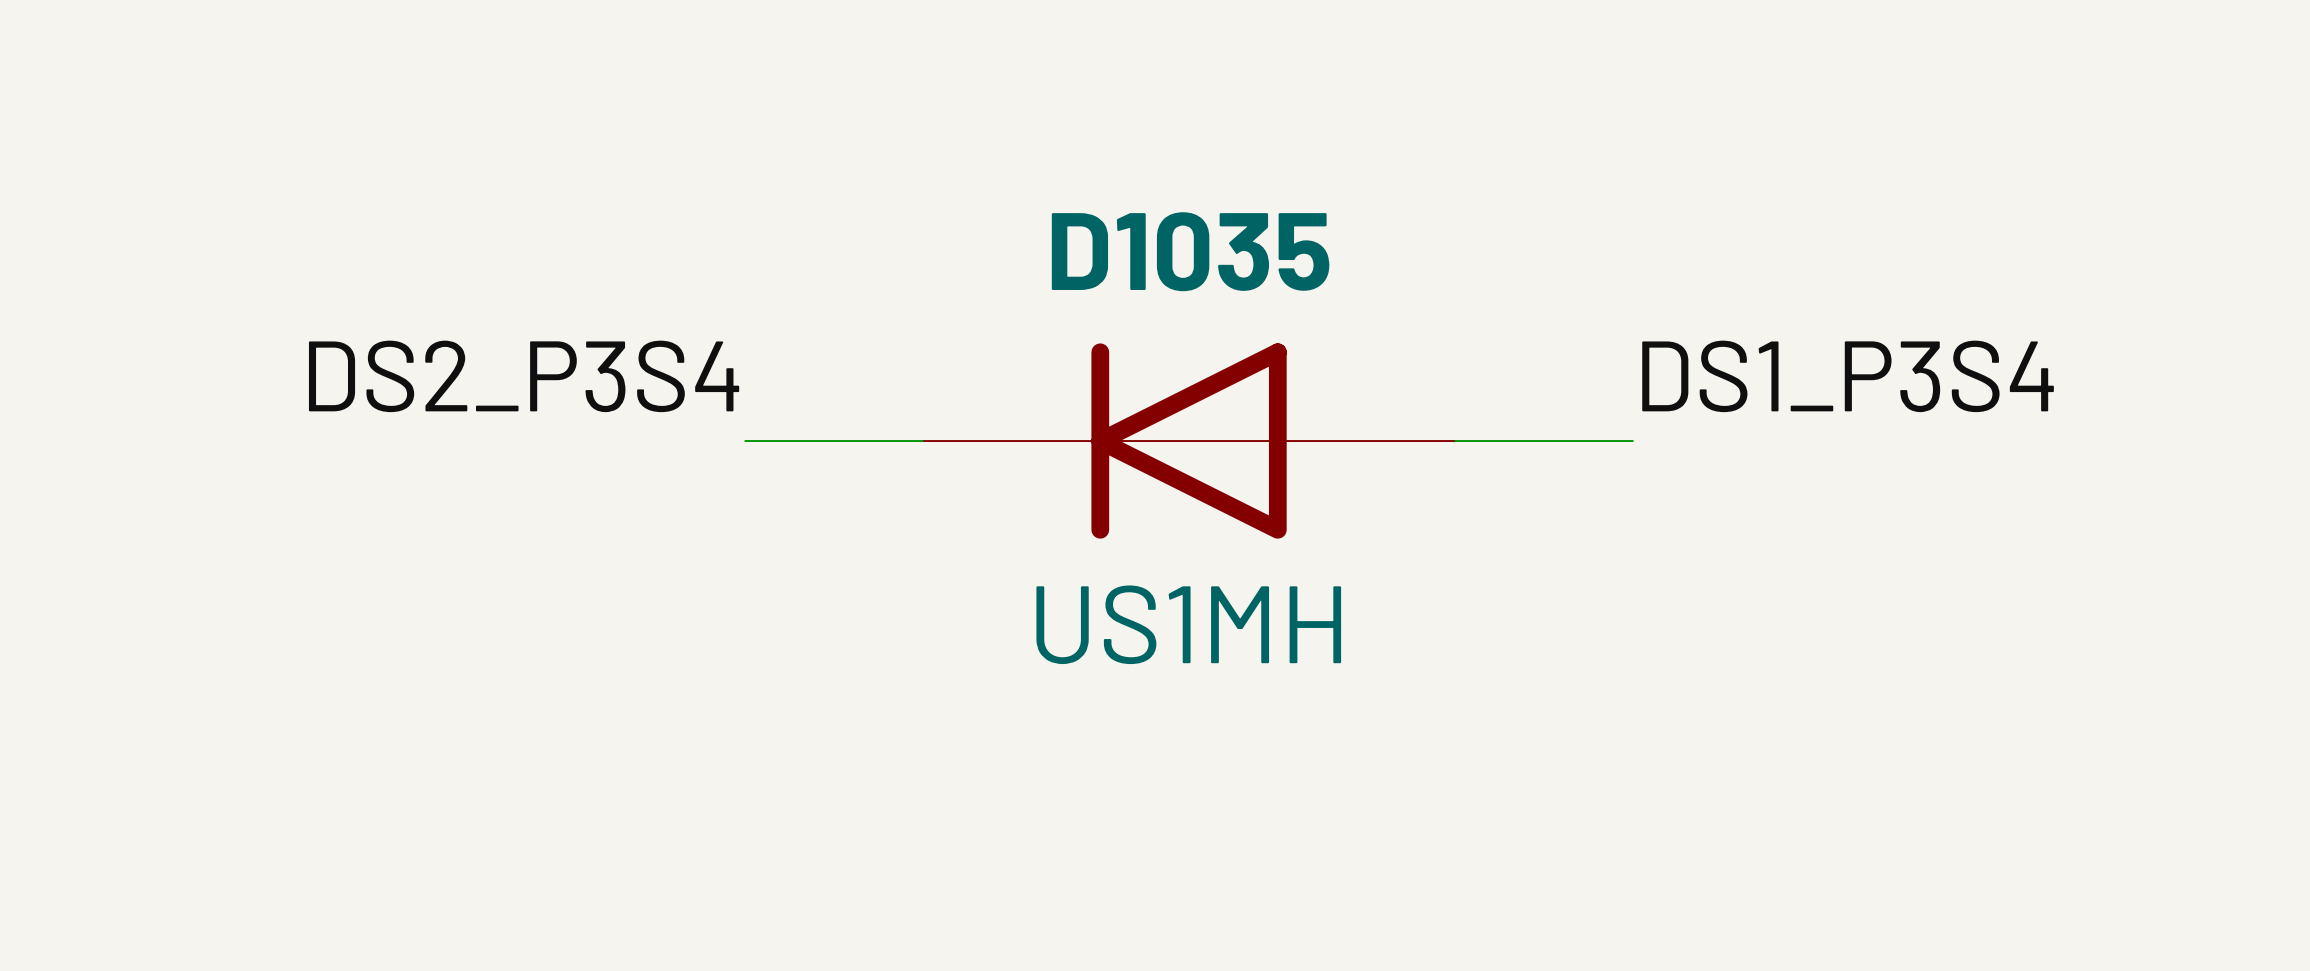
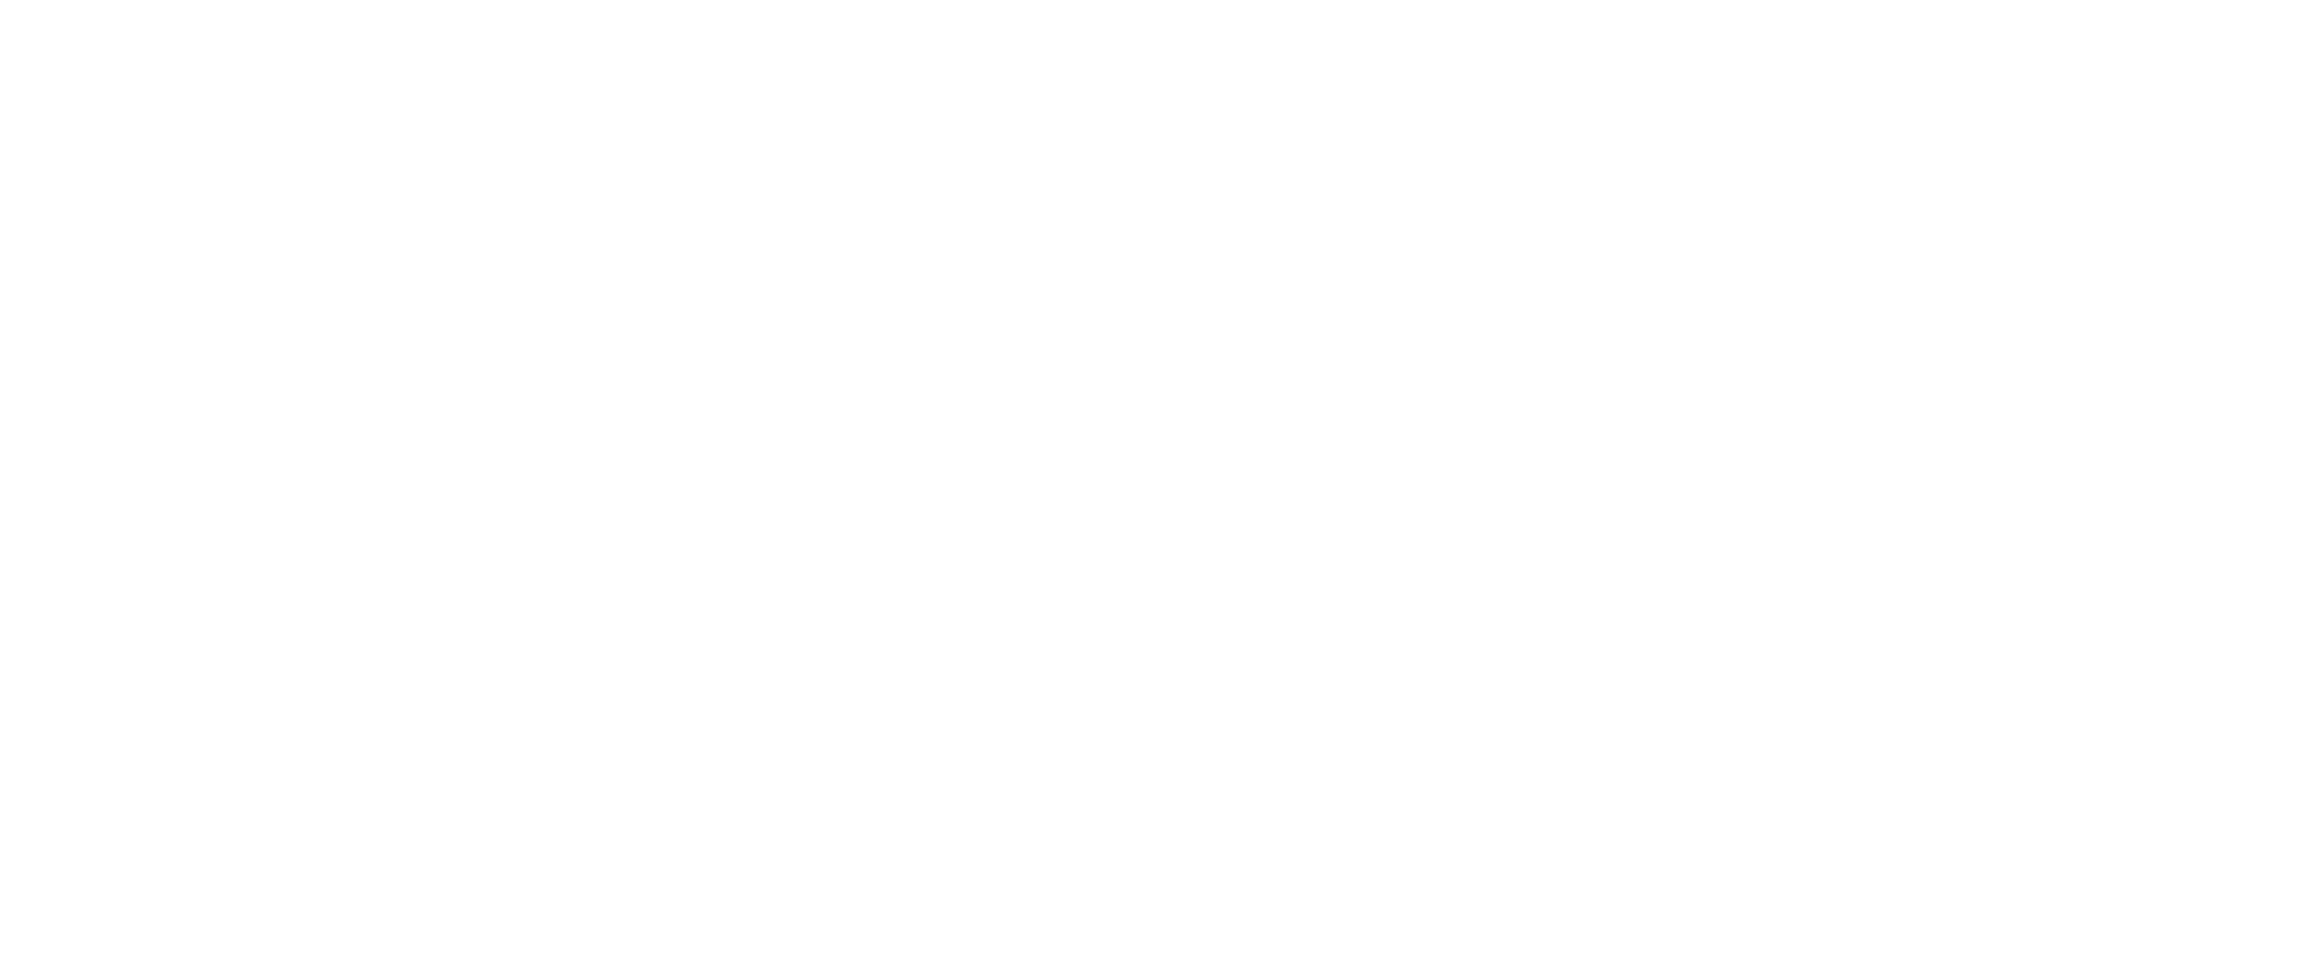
label: DS2_P3S4 (524, 376) -> none
label: DS1_P3S4 (1848, 376) -> none
wire: (745, 441) (922, 441) -> none
D1035: US1MH (1189, 441) -> none
wire: (1455, 441) (1632, 441) -> none

